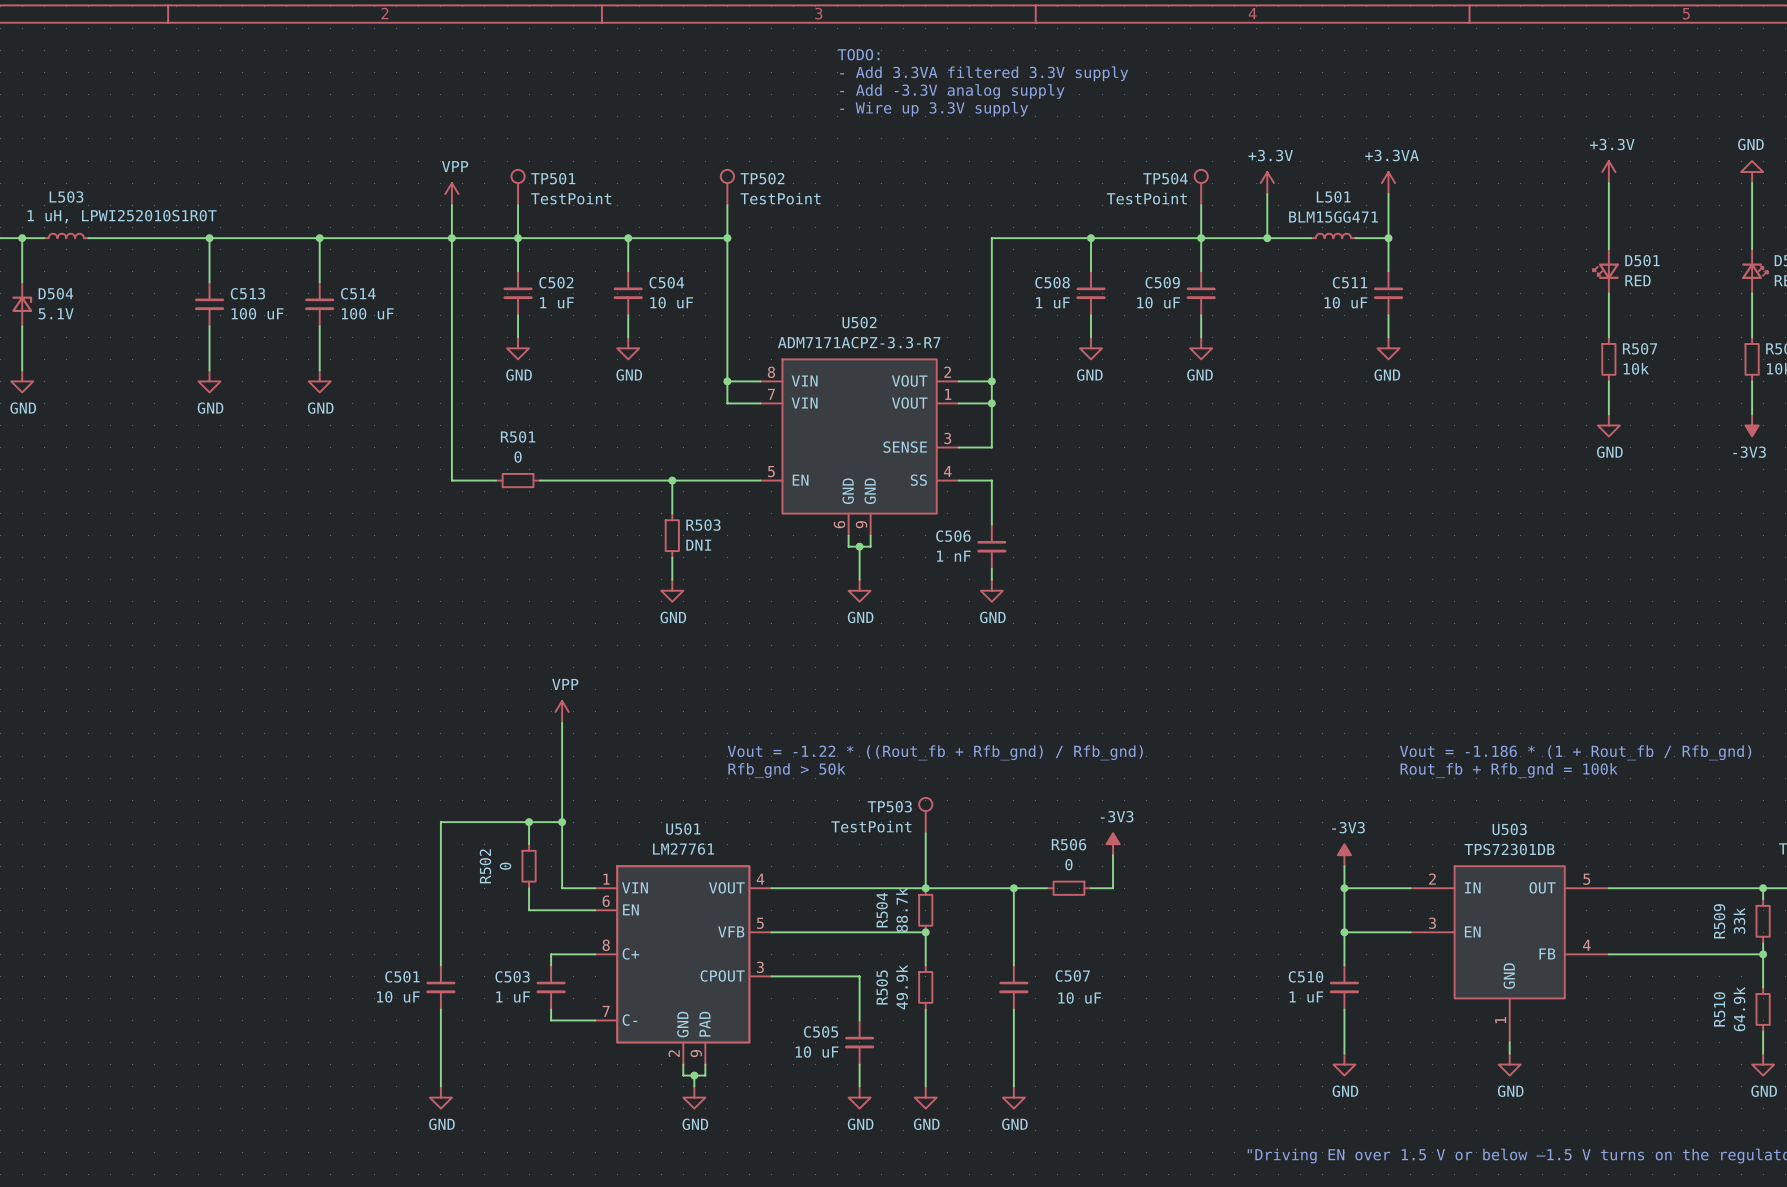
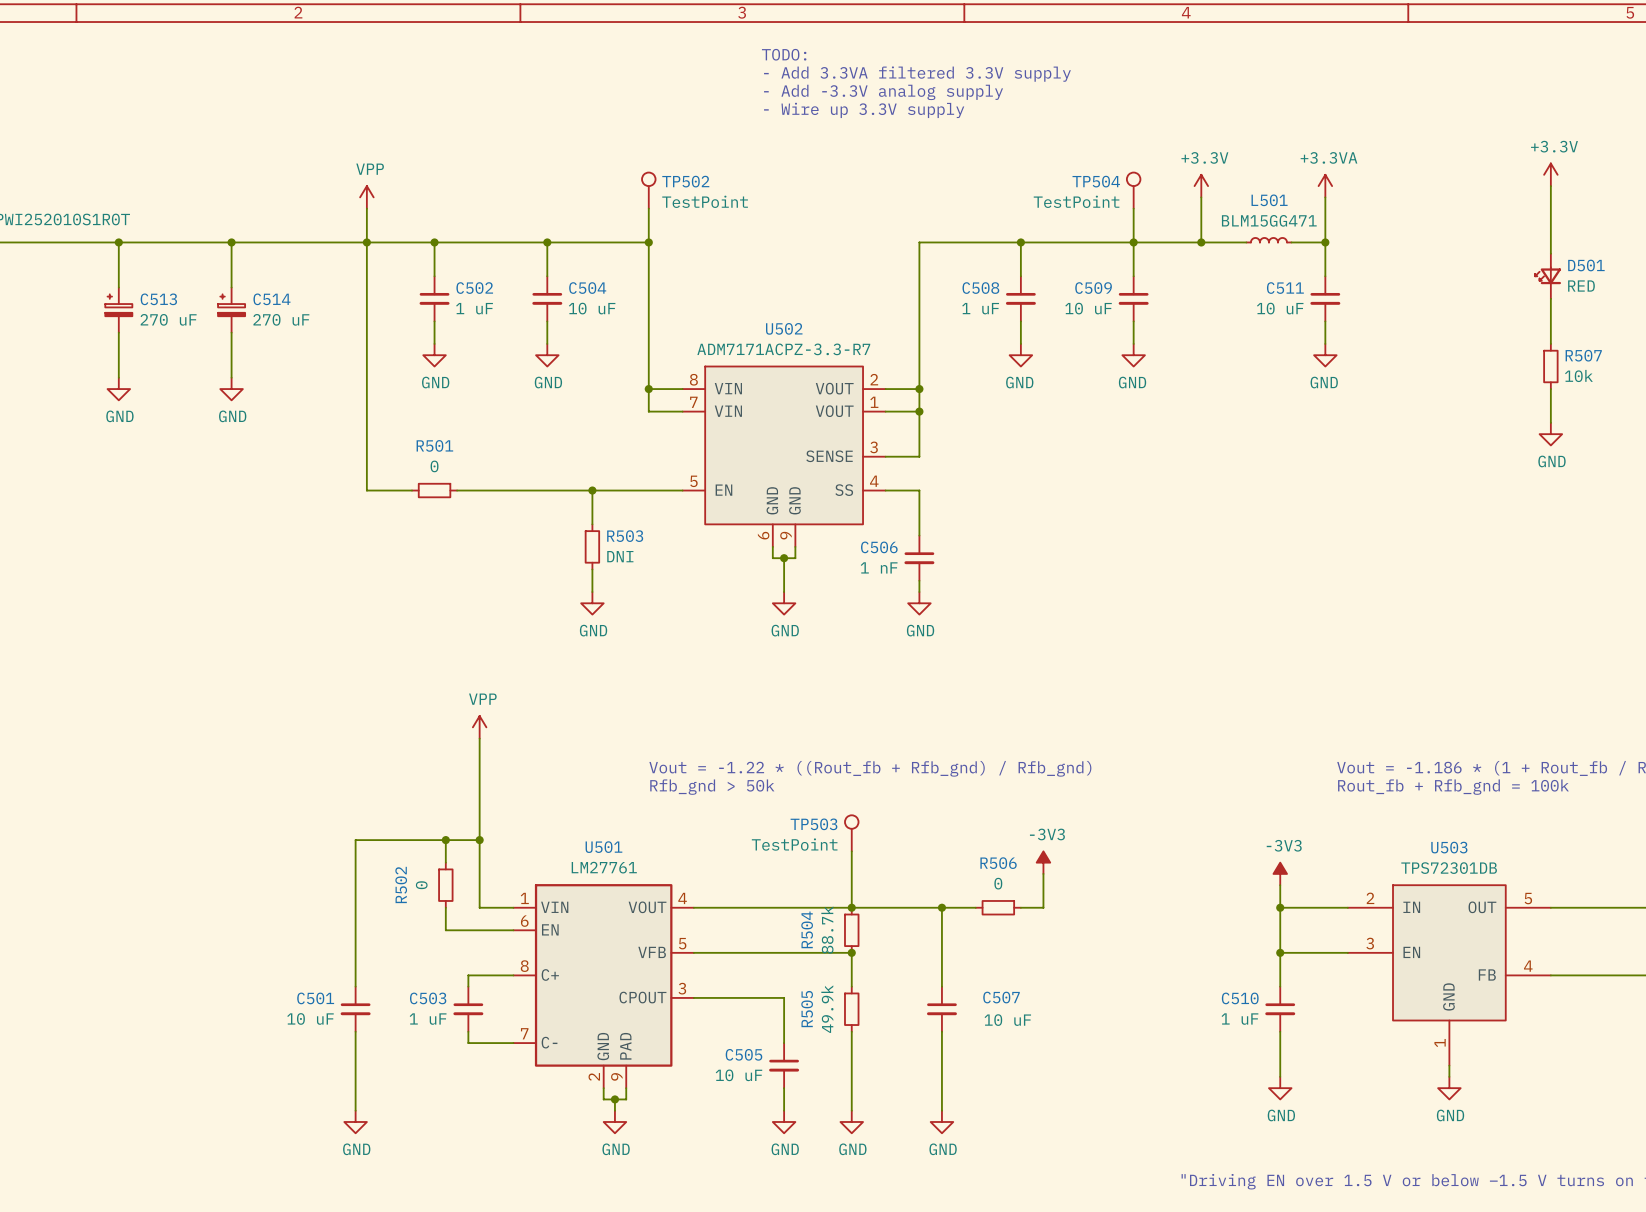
TP501: TestPoint (518, 187) -> none
wire: (518, 205) (518, 238) -> none
C513 symbol: [194, 282, 225, 327] -> [105, 287, 133, 333]
C514 symbol: [305, 282, 335, 327] -> [218, 287, 246, 333]
C513 value: 100 uF (257, 313) -> 270 uF (168, 319)
C514 value: 100 uF (367, 313) -> 270 uF (281, 319)

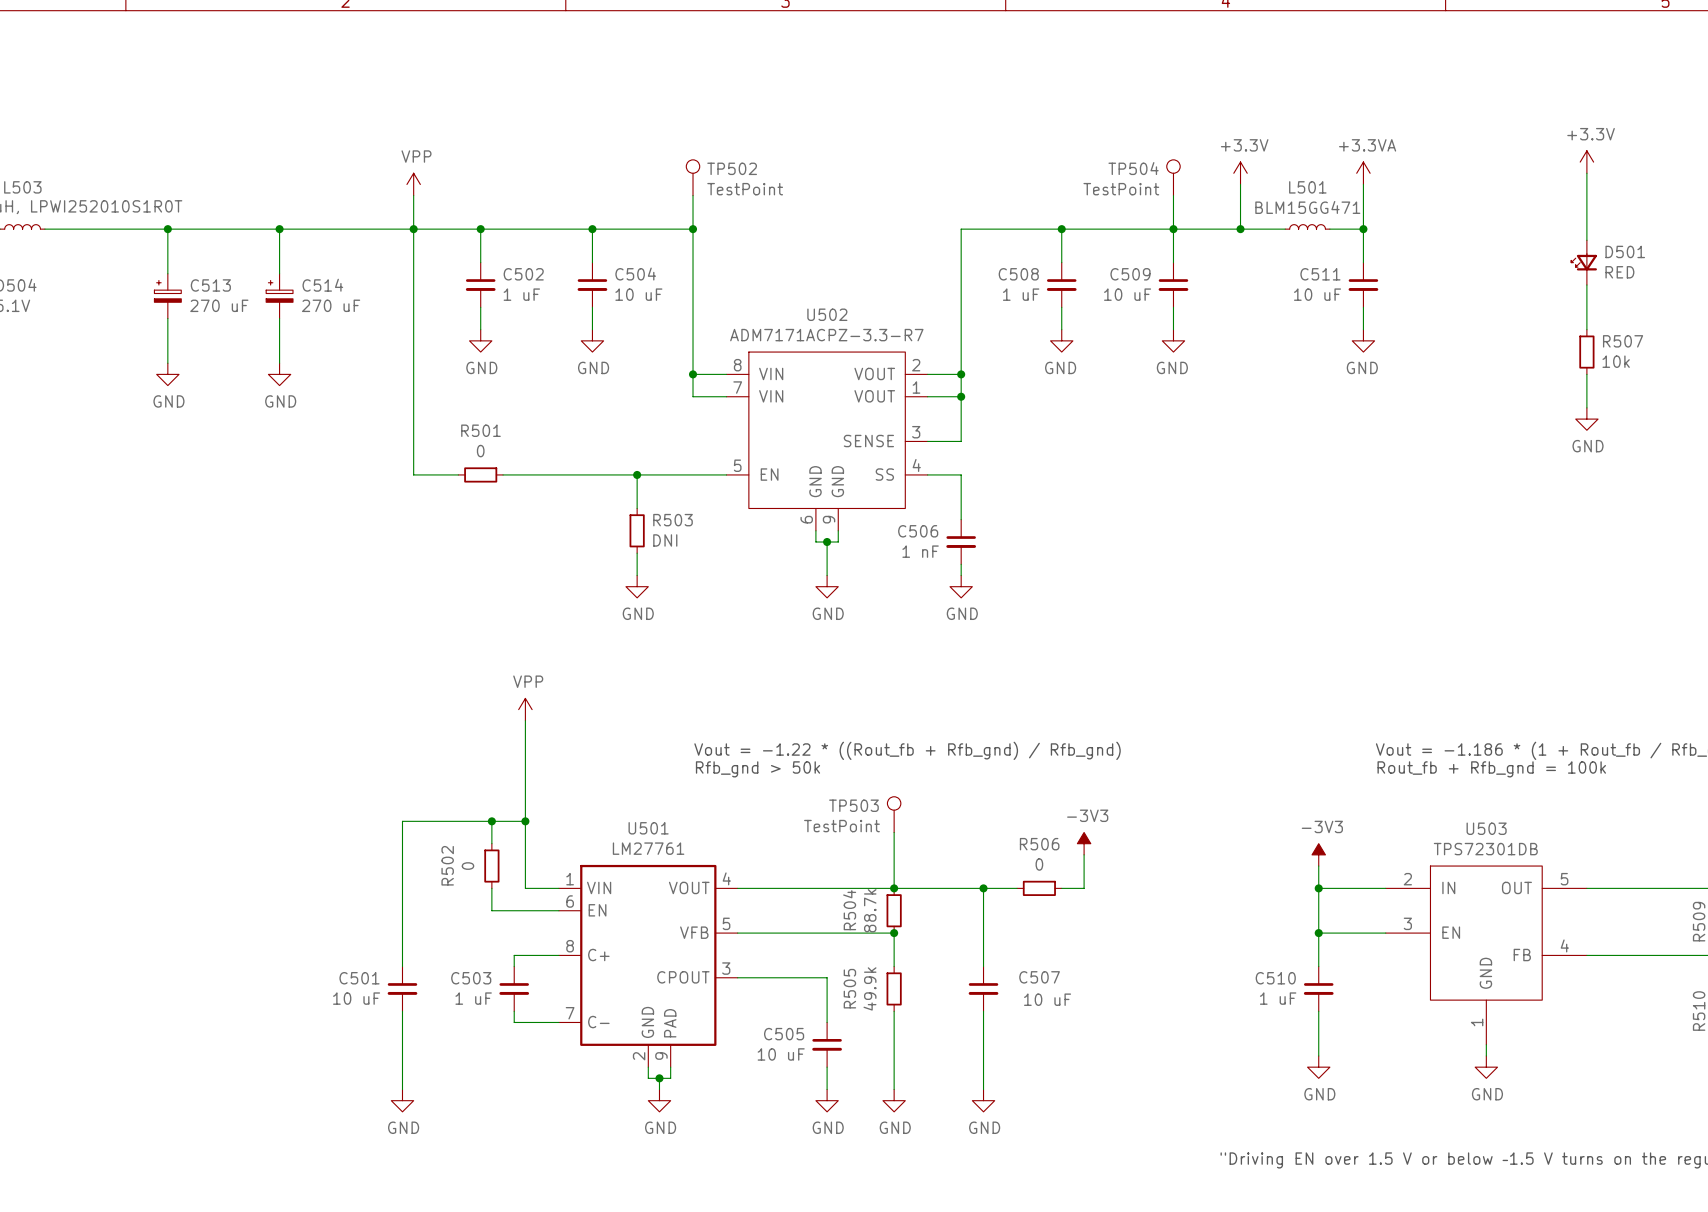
text: TODO: (784, 54) -> none
text: - Add 3.3VA filtered 3.3V supply (917, 74) -> none
text: - Add -3.3V analog supply (883, 92) -> none
text: - Wire up 3.3V supply (864, 110) -> none

